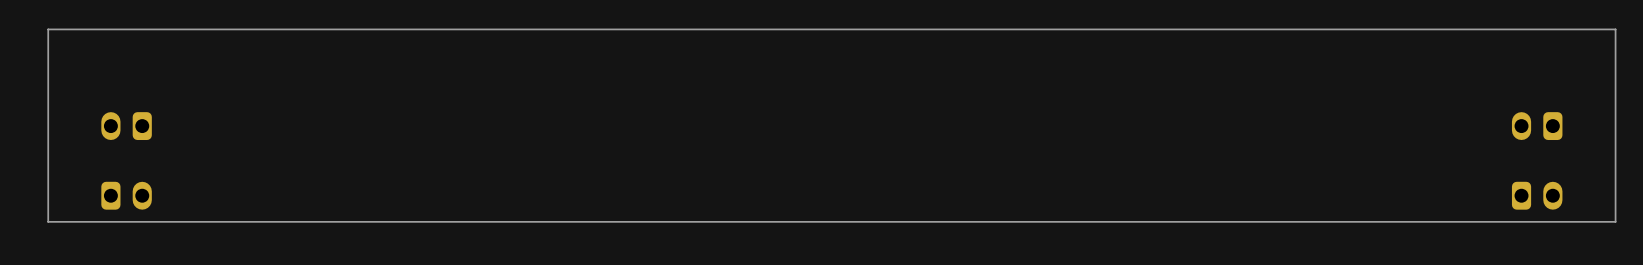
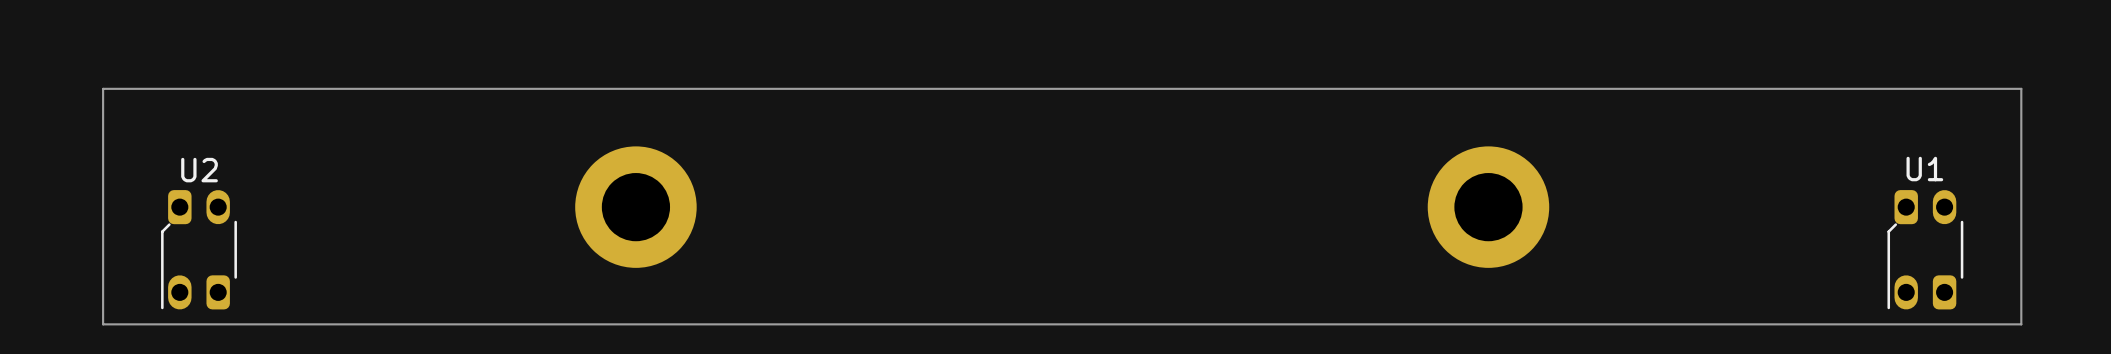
part: none -> (635, 207)
part: none -> (1488, 207)
U2 side: top (126, 160) -> bottom (199, 249)
U1 side: top (1537, 160) -> bottom (1925, 249)

